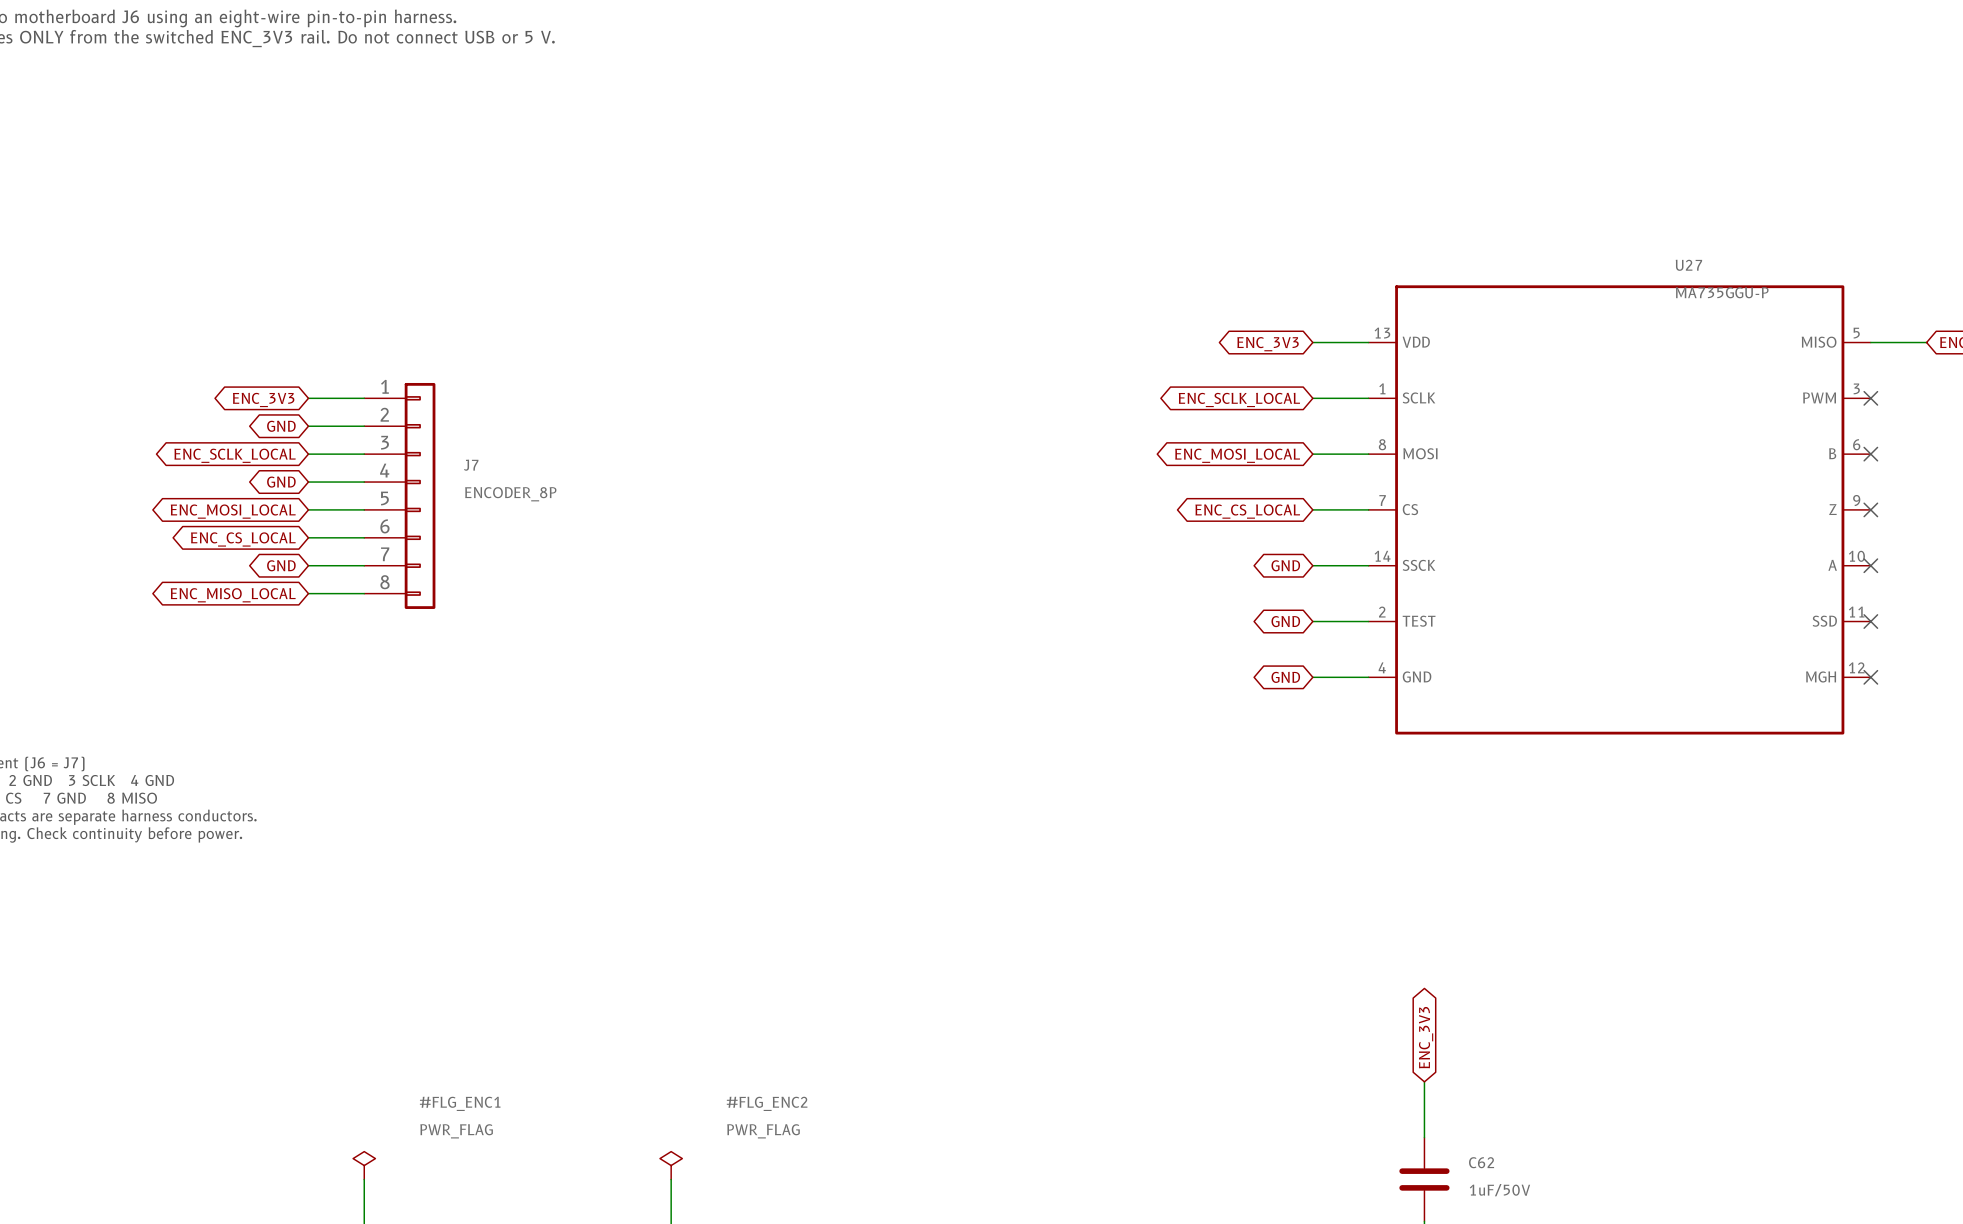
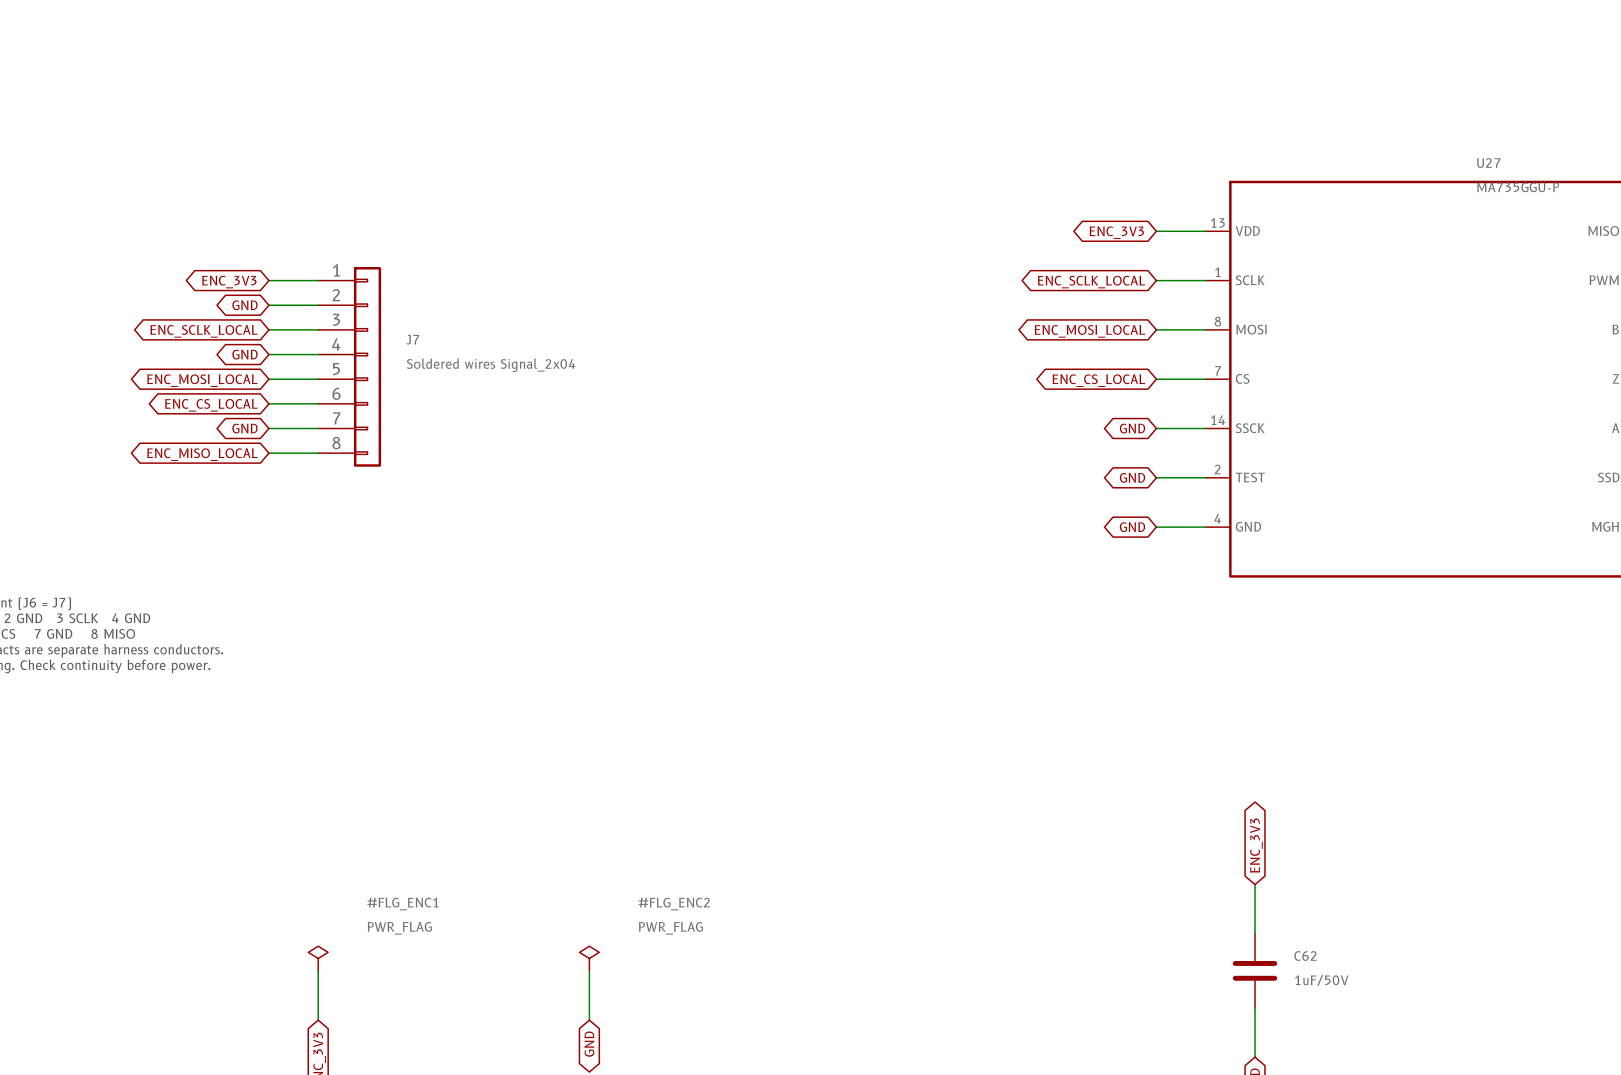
J7 value: ENCODER_8P (510, 494) -> Soldered wires Signal_2x04 (491, 365)

